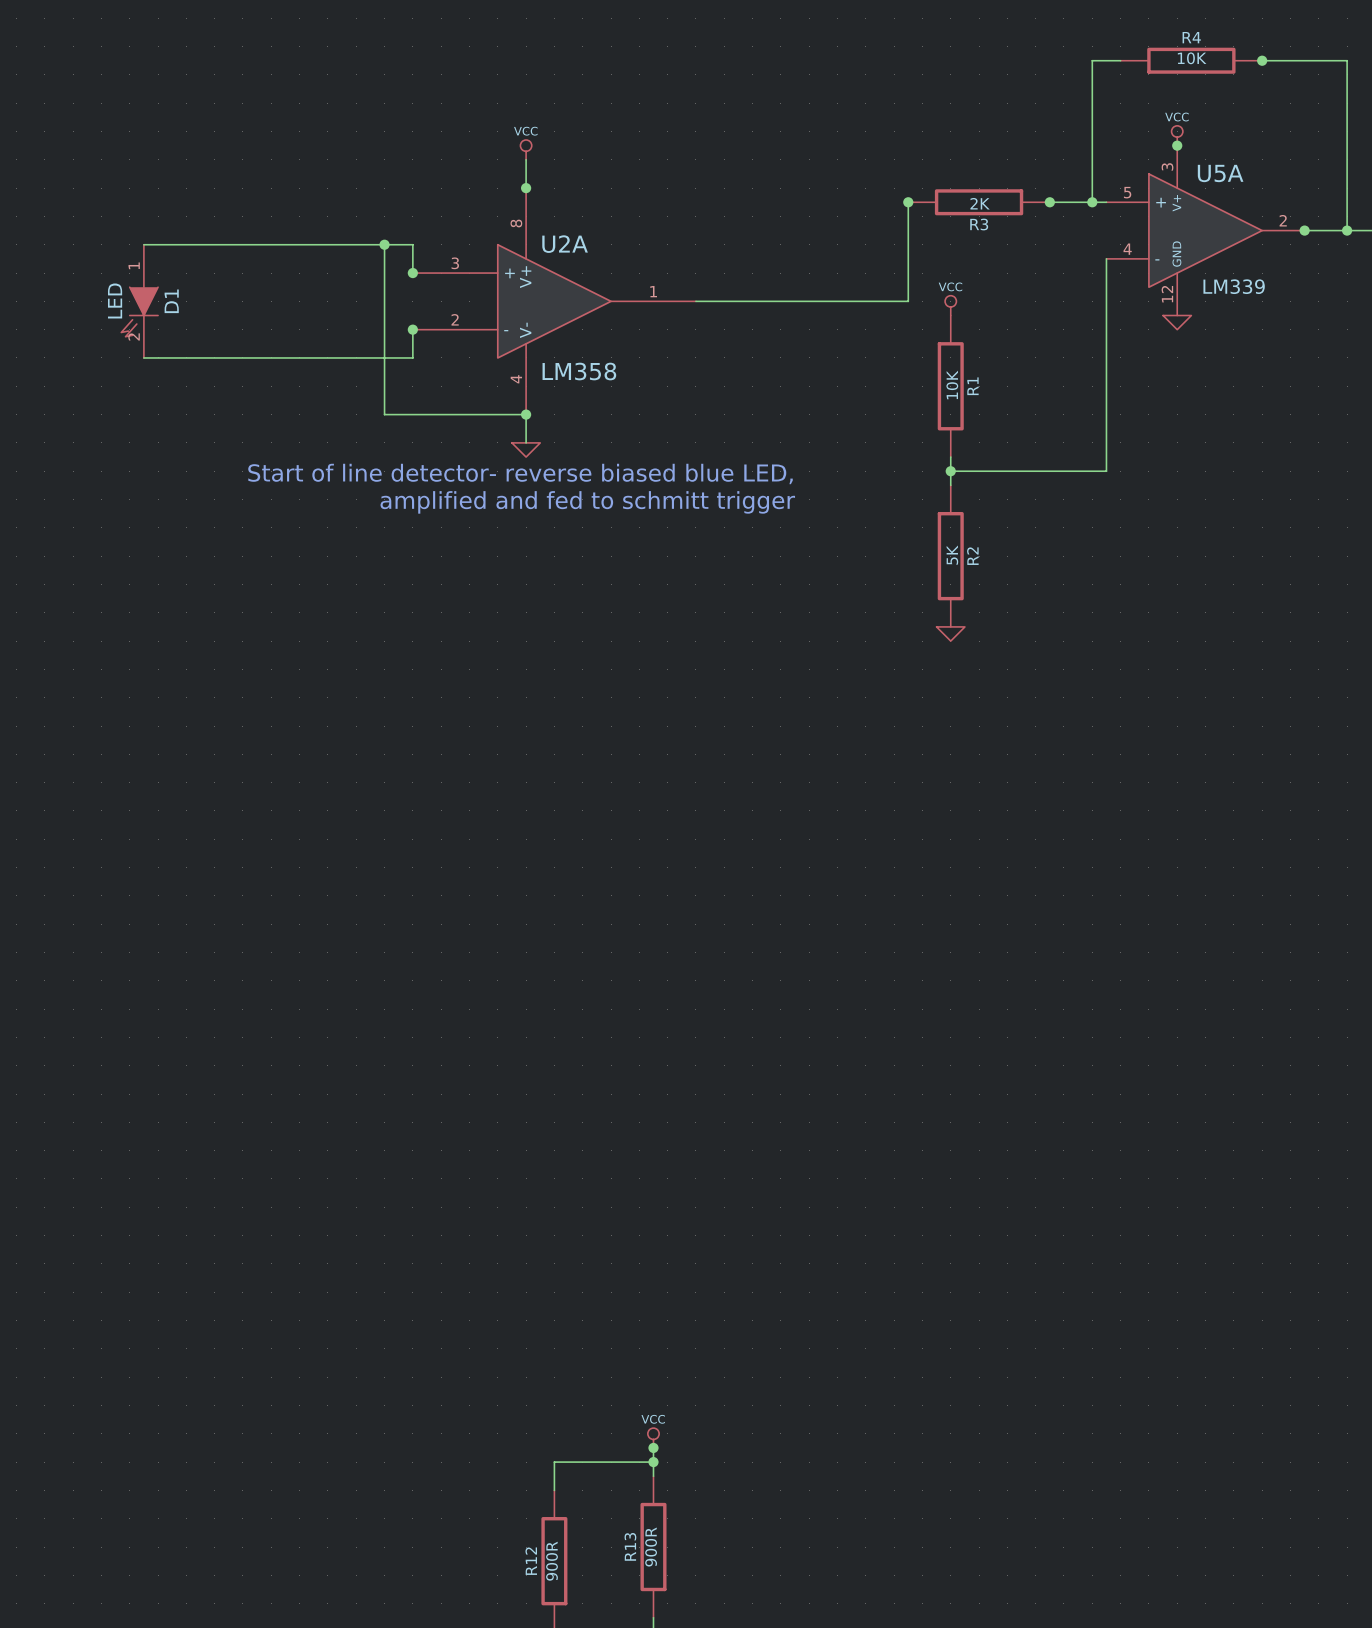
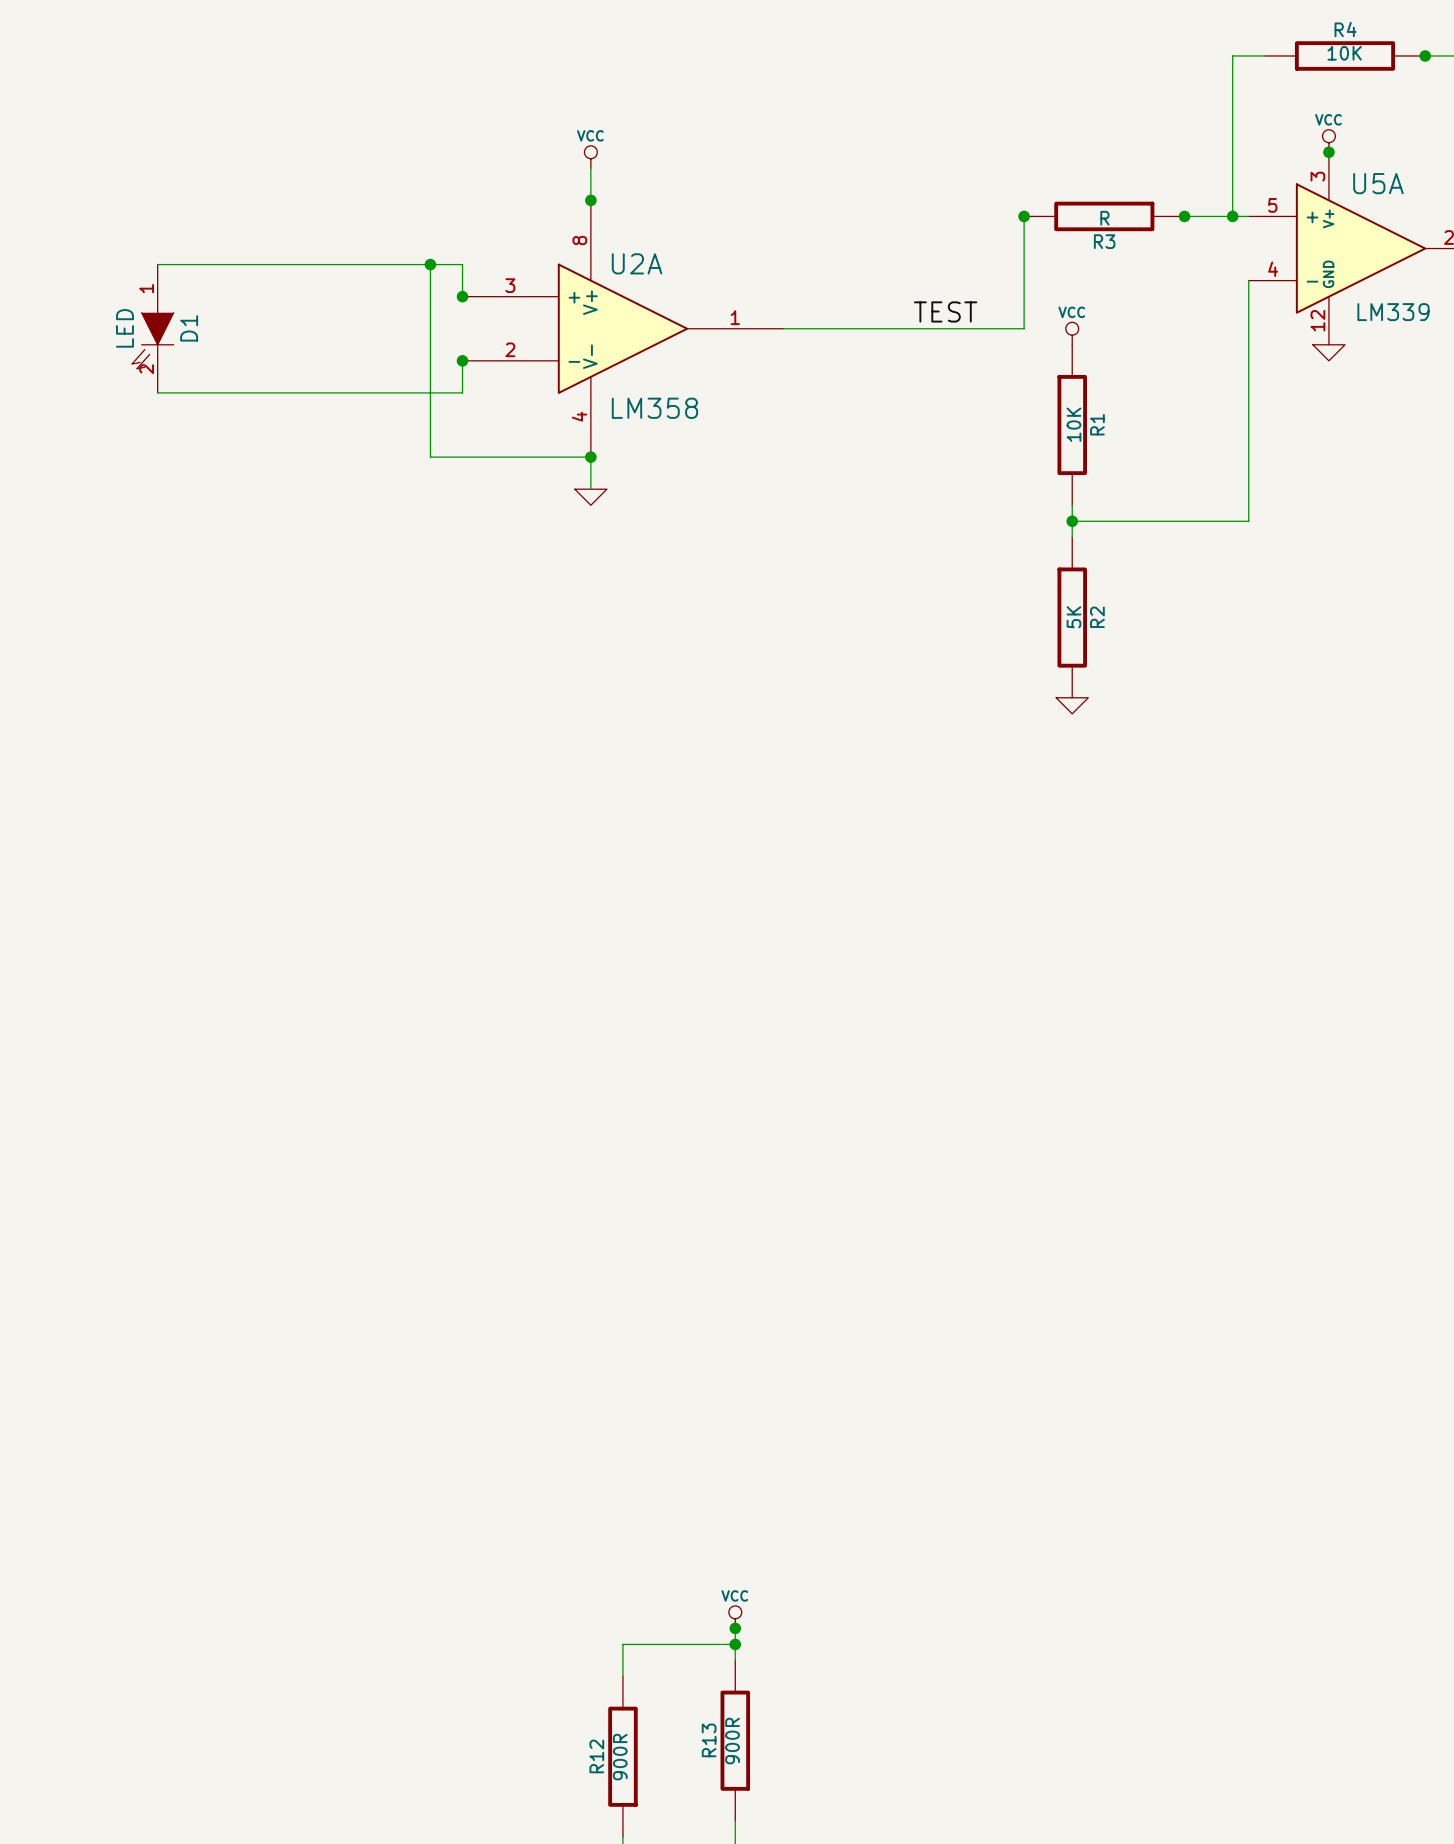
R3 value: 2K (980, 203) -> R (1104, 218)
label: none -> TEST (945, 311)
text: Start of line detector- reverse biased blue LED, (520, 473) -> none
text: amplified and fed to schmitt trigger (587, 502) -> none

